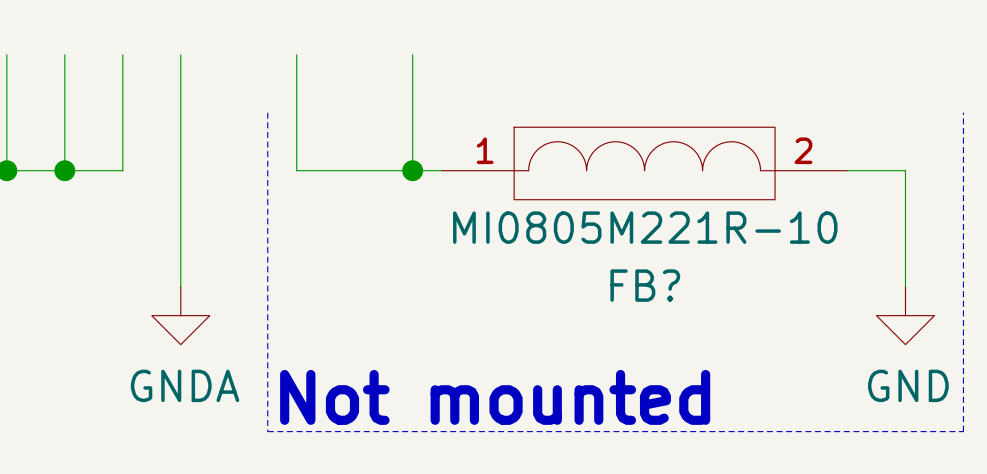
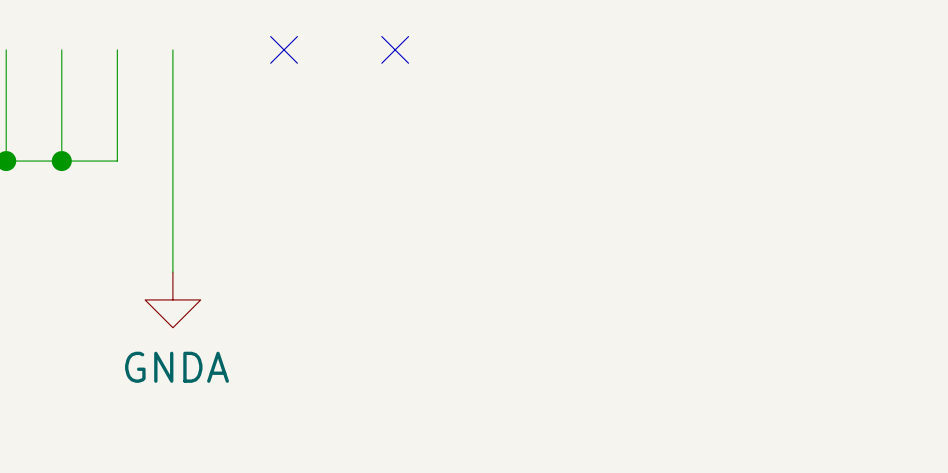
wire: (296, 54) (296, 170) (441, 170) -> none
no-connect mark: none -> (284, 49)
wire: (412, 54) (412, 170) -> none
no-connect mark: none -> (395, 49)
line: (267, 112) (267, 431) (963, 431) (963, 112) -> none
FB?: MI0805M221R-10 (644, 163) -> none
junction: (412, 170) -> none
wire: (847, 170) (905, 170) (905, 286) -> none
power symbol: GND (905, 315) -> none
text: Not mounted (495, 397) -> none

